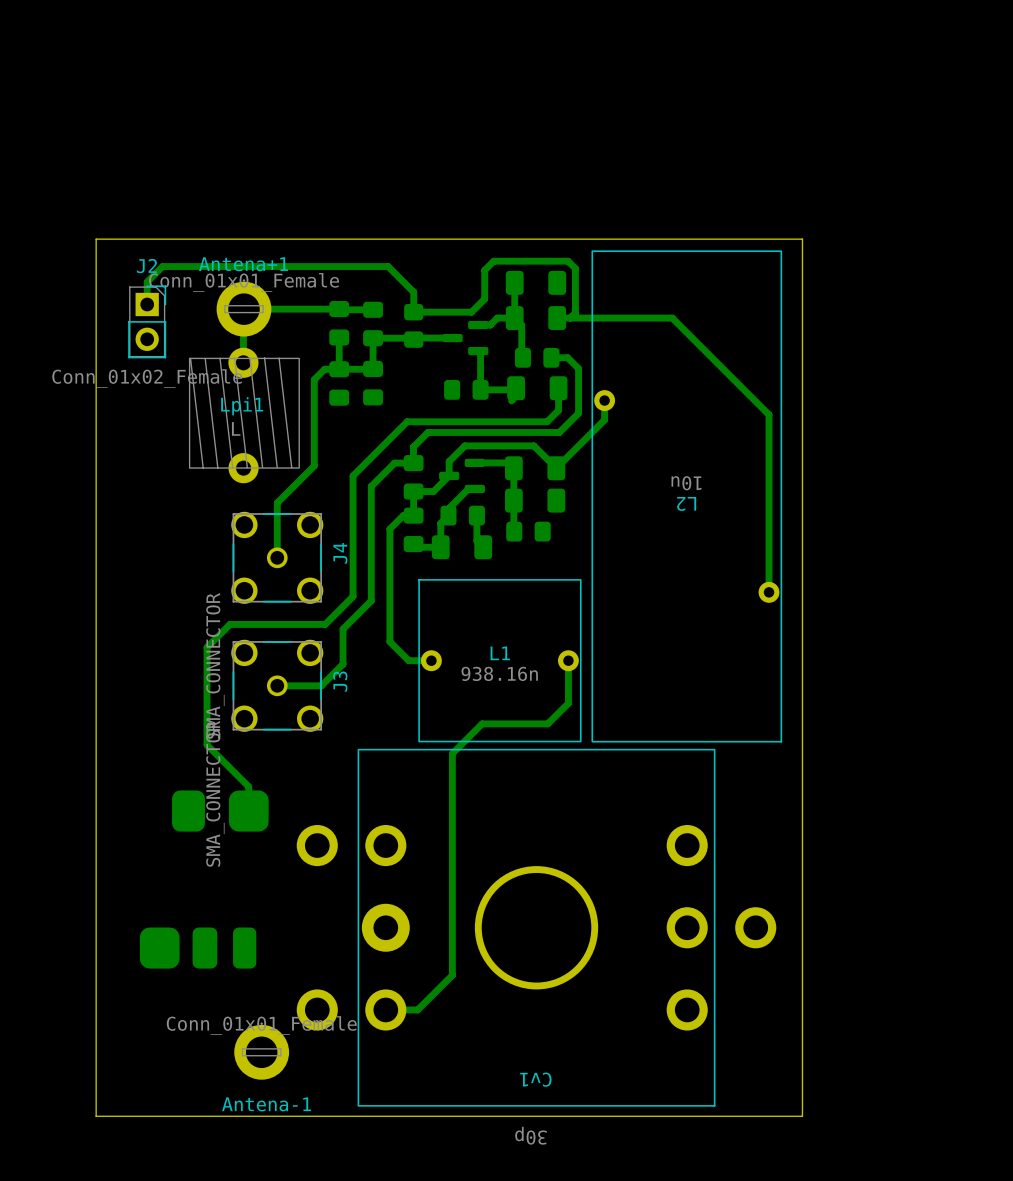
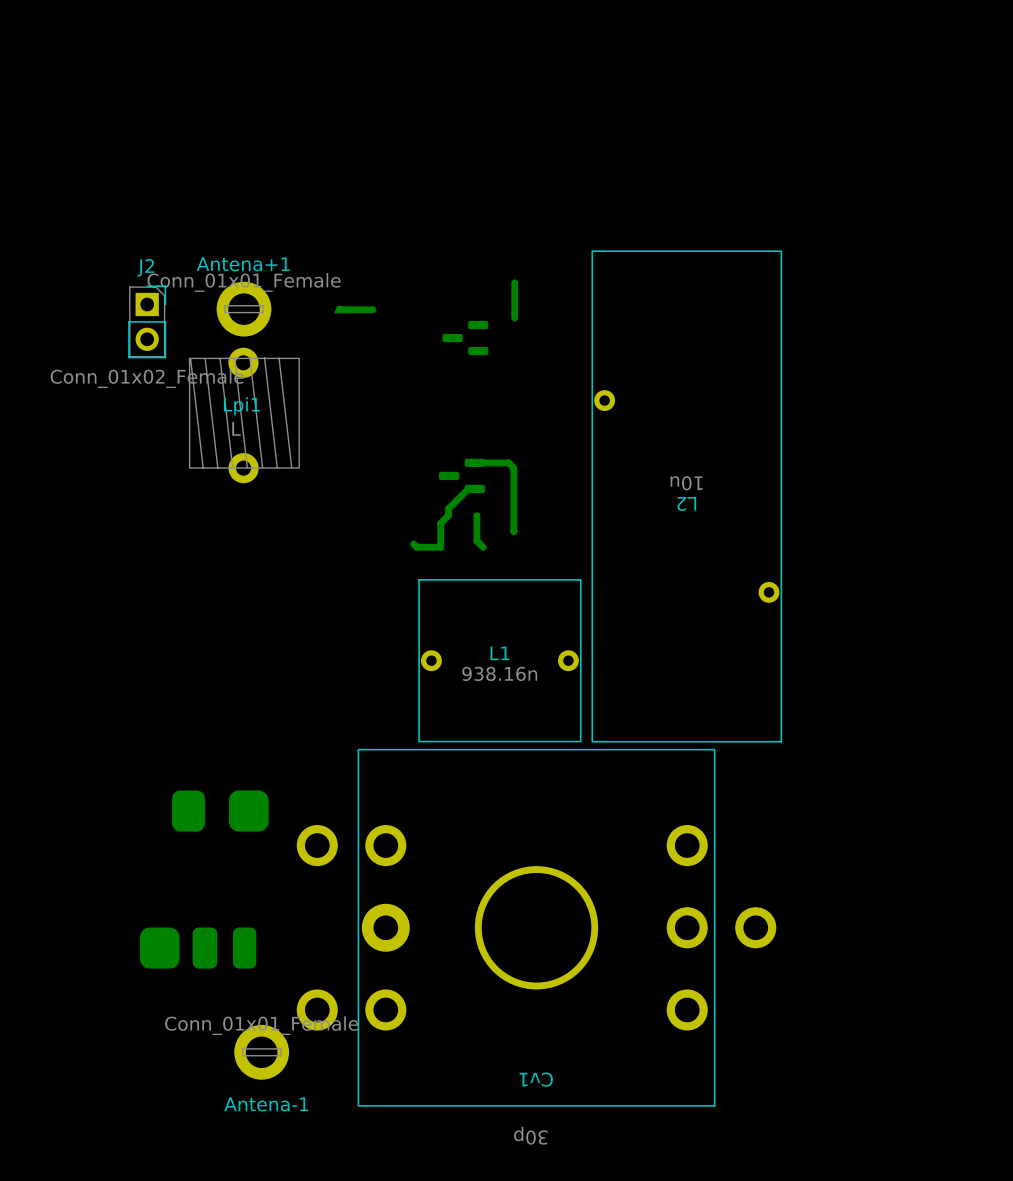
board edge: (96, 239) (802, 239) (802, 1116) (96, 1116) (96, 239) -> none
part: (535, 282) -> none
bottom track: (147, 304) (147, 281) (162, 266) (388, 266) (413, 292) (413, 312) (471, 312) (484, 299) (484, 270) (493, 261) (568, 261) (575, 268) (575, 312) (570, 318) -> none
bottom track: (339, 309) (243, 309) (243, 362) -> none
bottom track: (514, 318) (497, 318) (490, 325) (478, 325) -> none
bottom track: (514, 318) (521, 325) (521, 351) -> none
part: (535, 318) -> none
bottom track: (557, 318) (672, 318) (769, 414) (769, 592) -> none
part: (339, 323) -> none
part: (373, 323) -> none
part: (413, 325) -> none
bottom track: (339, 337) (339, 369) -> none
bottom track: (452, 338) (373, 338) (373, 368) -> none
bottom track: (478, 351) (480, 353) (480, 389) (514, 389) (516, 388) -> none
part: (537, 357) -> none
bottom track: (551, 357) (567, 357) (578, 368) (578, 413) (559, 432) (428, 432) (413, 446) (413, 462) -> none
bottom track: (373, 368) (324, 369) (314, 379) (314, 465) (277, 502) (277, 557) -> none
part: (339, 383) -> none
part: (373, 383) -> none
part: (537, 388) -> none
bottom track: (558, 388) (558, 410) (547, 421) (407, 421) (353, 475) (353, 596) (325, 624) (230, 624) (207, 647) (207, 744) (248, 786) (248, 811) -> none
part: (466, 389) -> none
bottom track: (513, 398) (511, 400) -> none
bottom track: (604, 400) (604, 419) (556, 468) (533, 445) (464, 445) (449, 461) (449, 475) (433, 491) (413, 491) (413, 515) (403, 515) (389, 529) (389, 641) (408, 660) (431, 660) -> none
bottom track: (413, 463) (394, 463) (371, 486) (371, 600) (343, 629) (343, 664) (321, 685) (277, 685) -> none
part: (535, 468) -> none
part: (413, 477) -> none
part: (535, 500) -> none
part: (462, 515) -> none
part: (413, 529) -> none
part: (528, 531) -> none
part: (462, 547) -> none
J4: SMA_CONNECTOR (277, 557) -> none
bottom track: (568, 660) (568, 703) (547, 723) (482, 723) (452, 753) (452, 975) (417, 1009) (385, 1009) -> none
J3: SMA_CONNECTOR (277, 685) -> none

